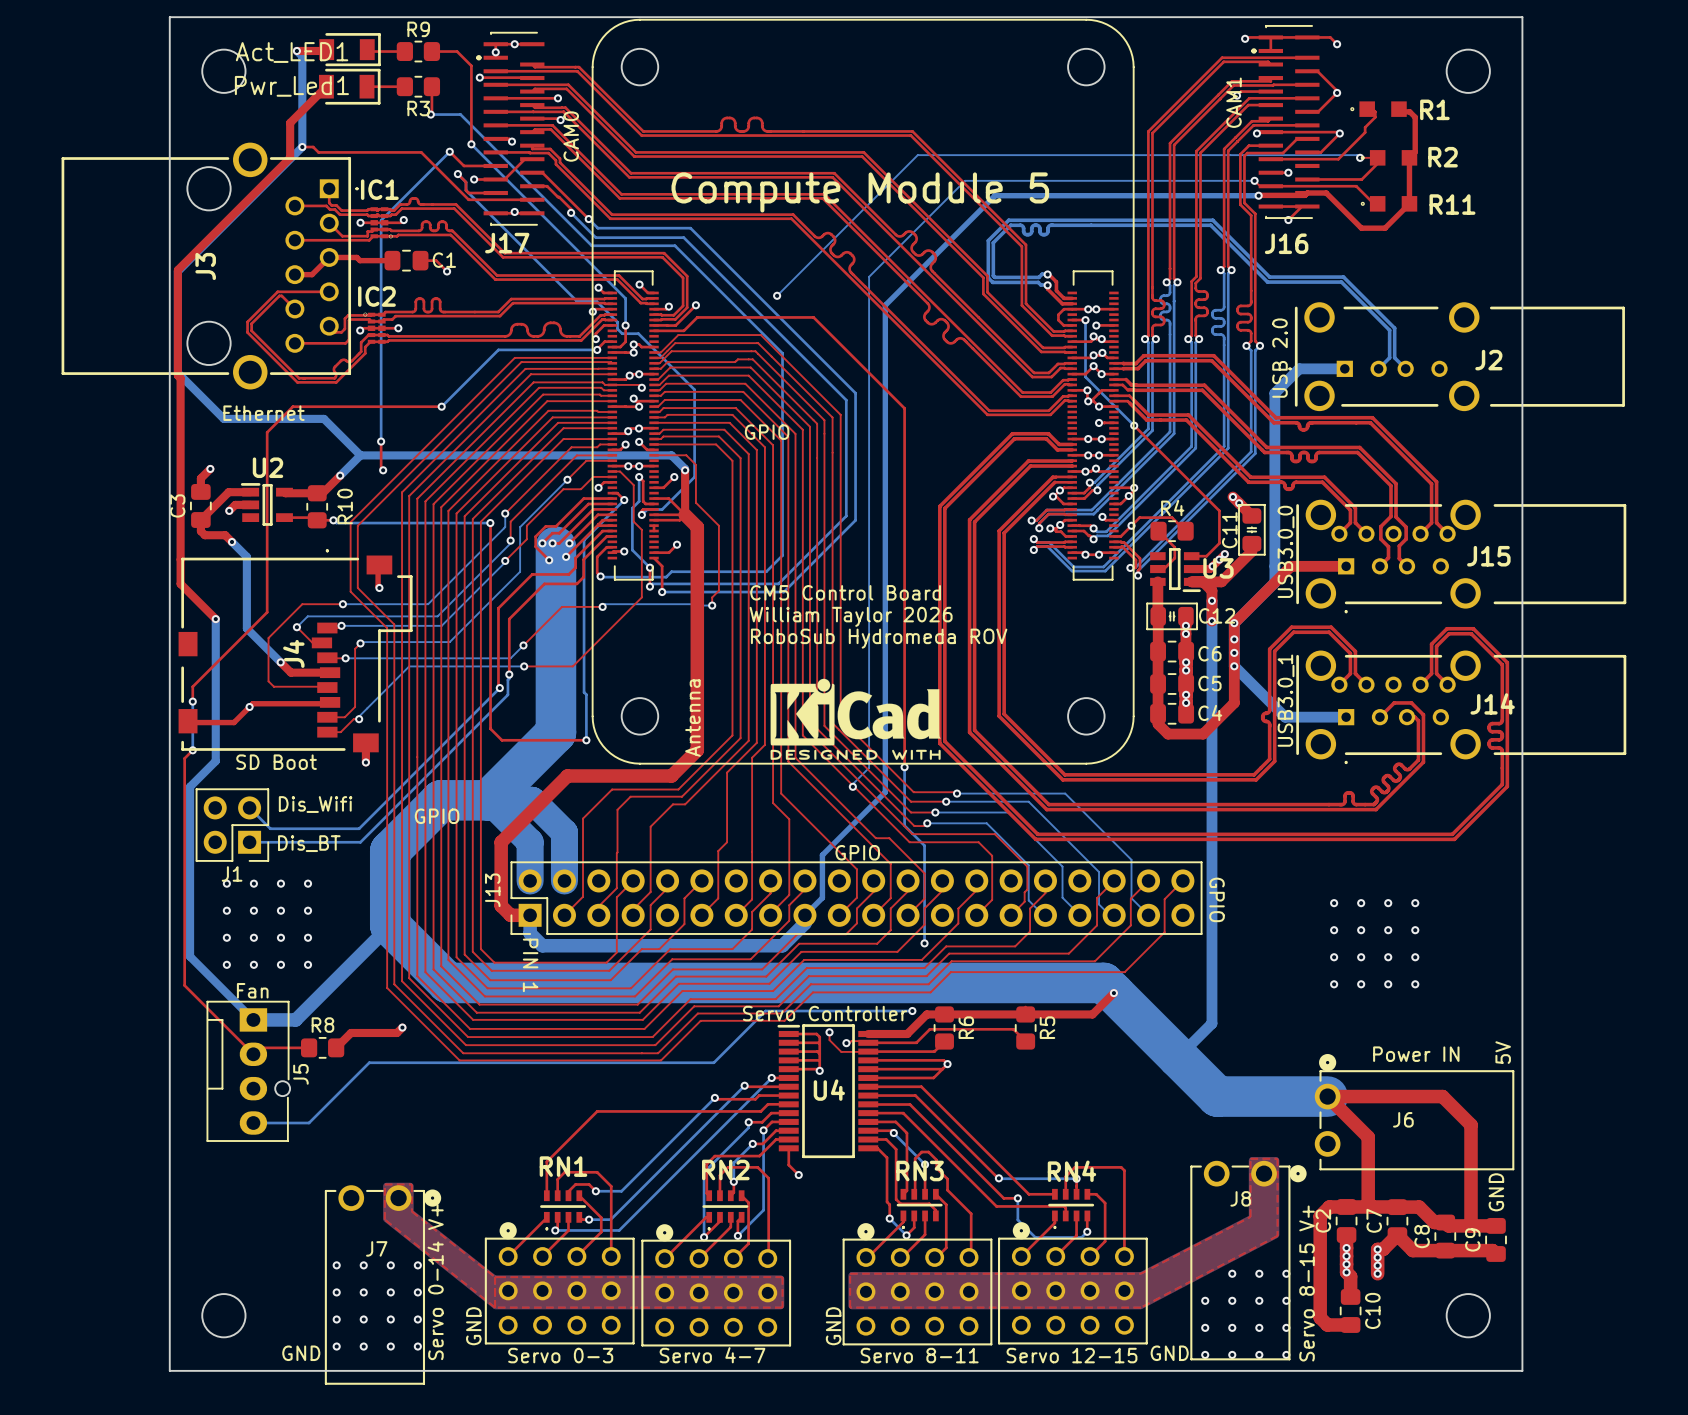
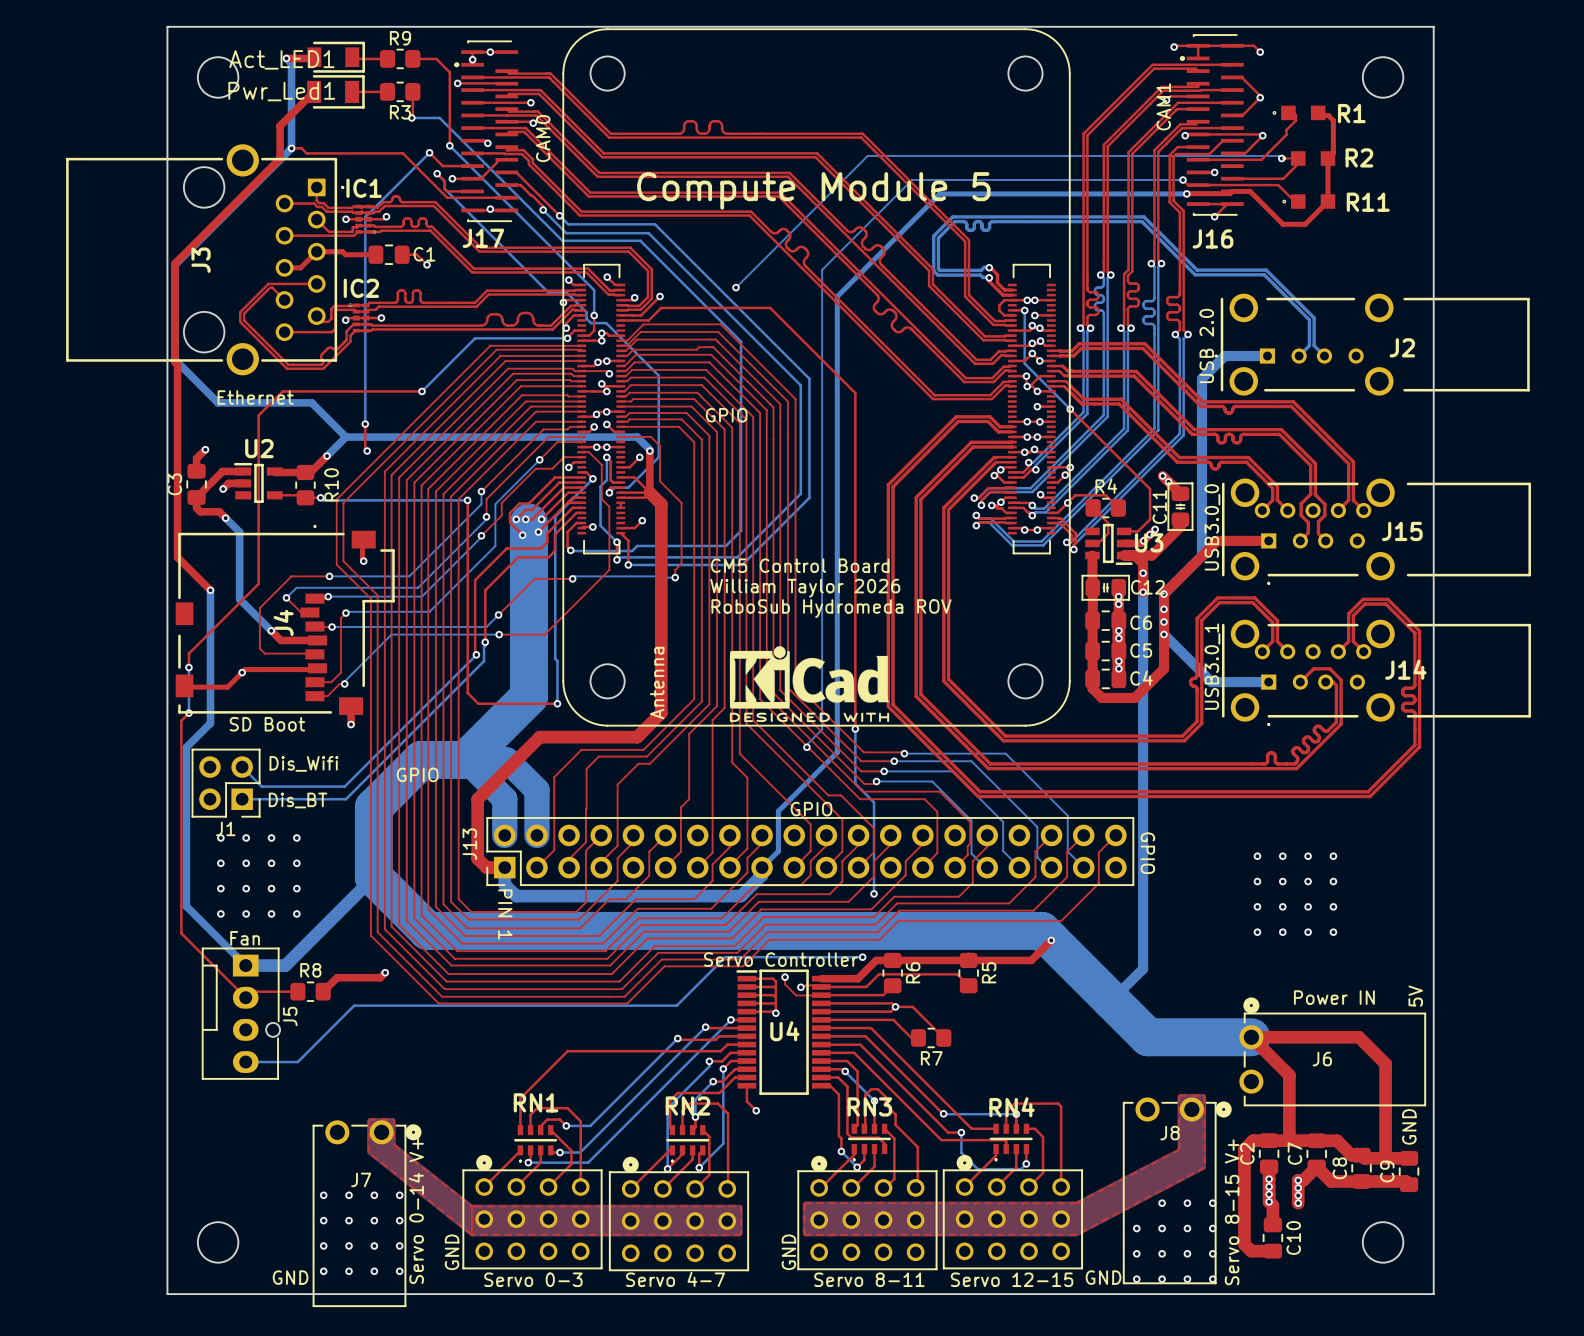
top track: none -> (895, 1006) (912, 1006) (943, 1037)
top track: (942, 1069) (933, 1077) -> (911, 1037) (893, 1019) (882, 1019)
R7: none -> (931, 1037)

